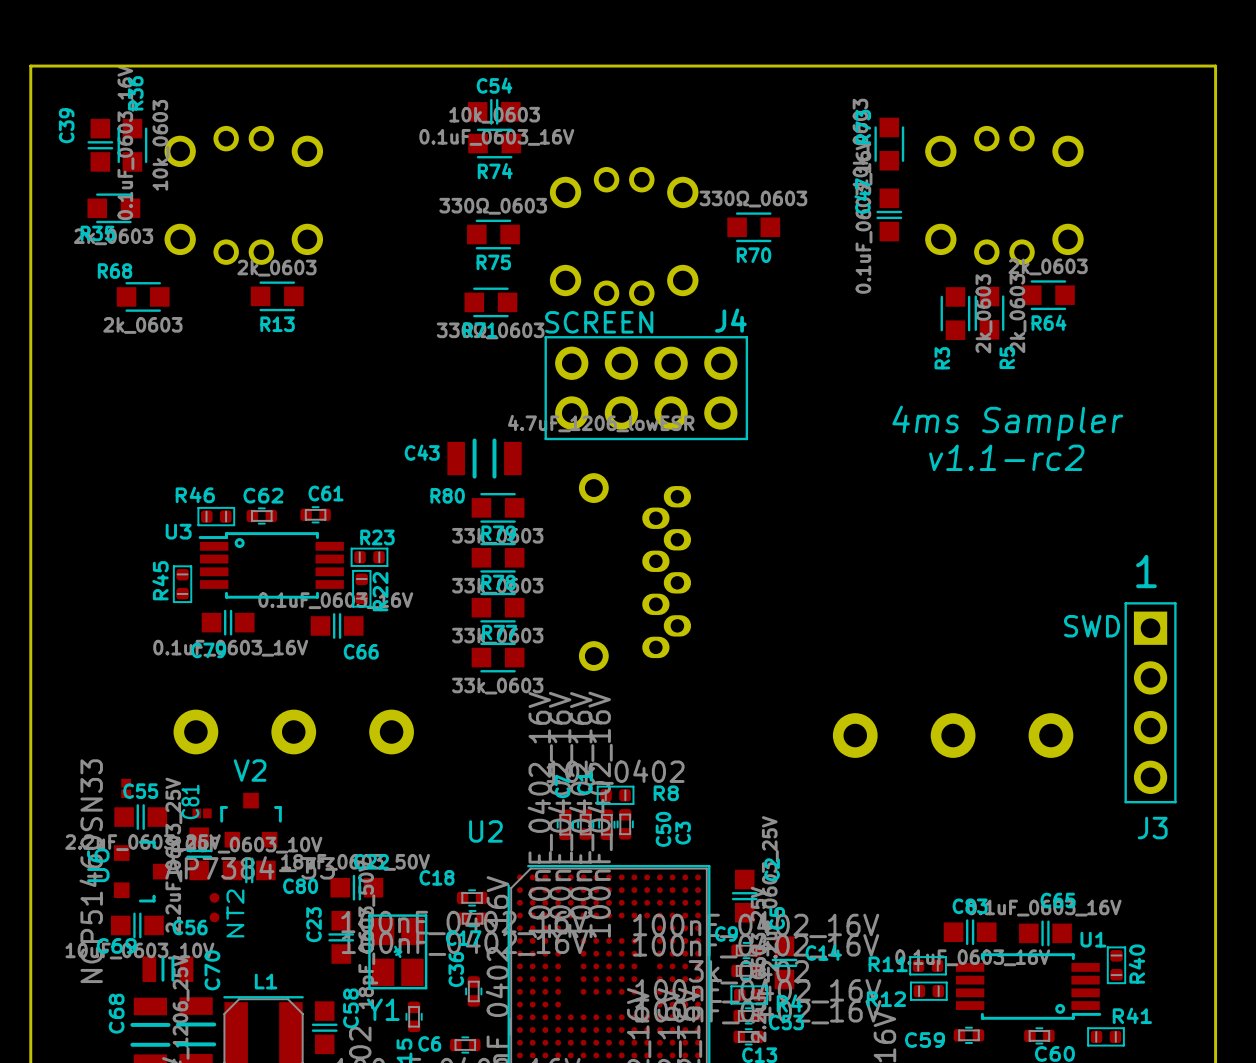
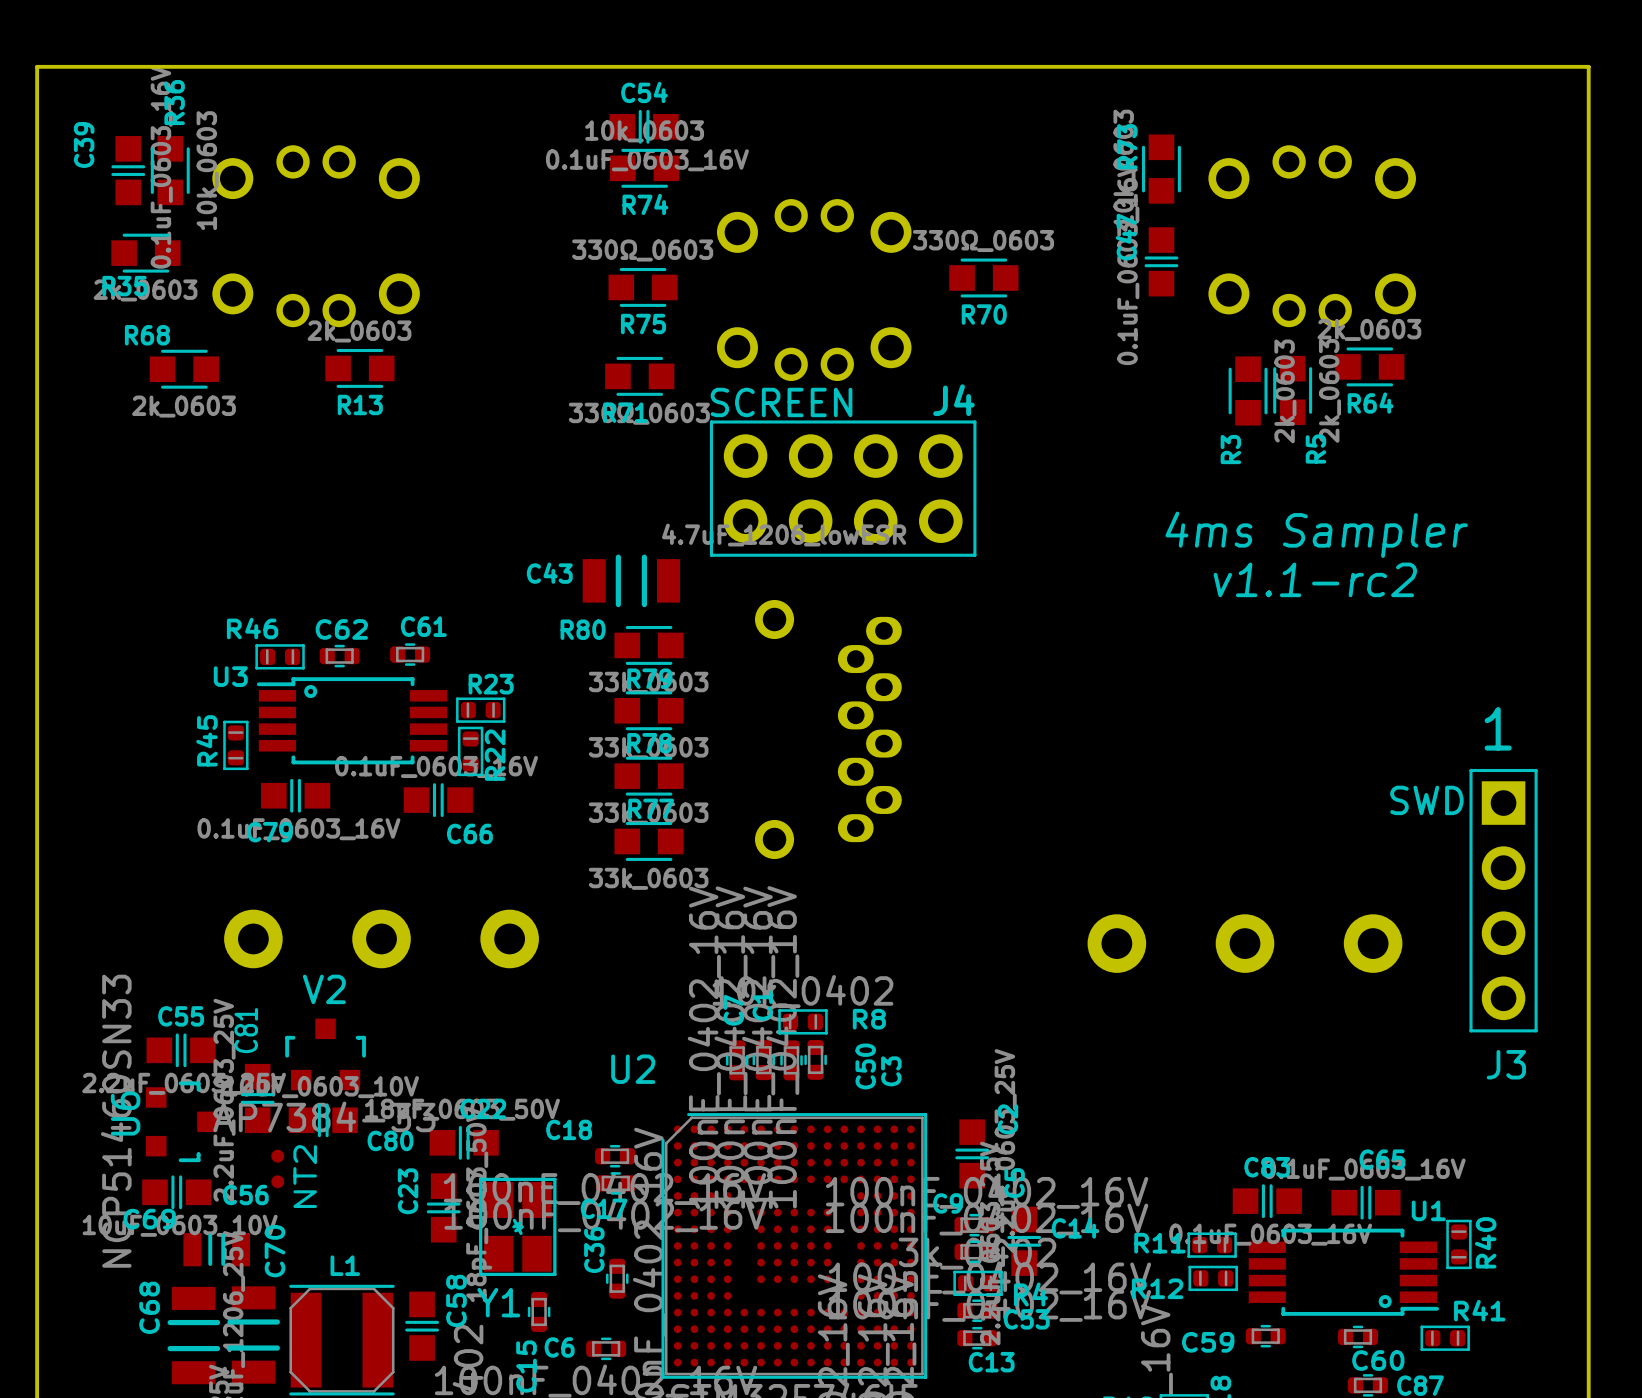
part: (126, 788) -> none
part: (202, 813) -> none

